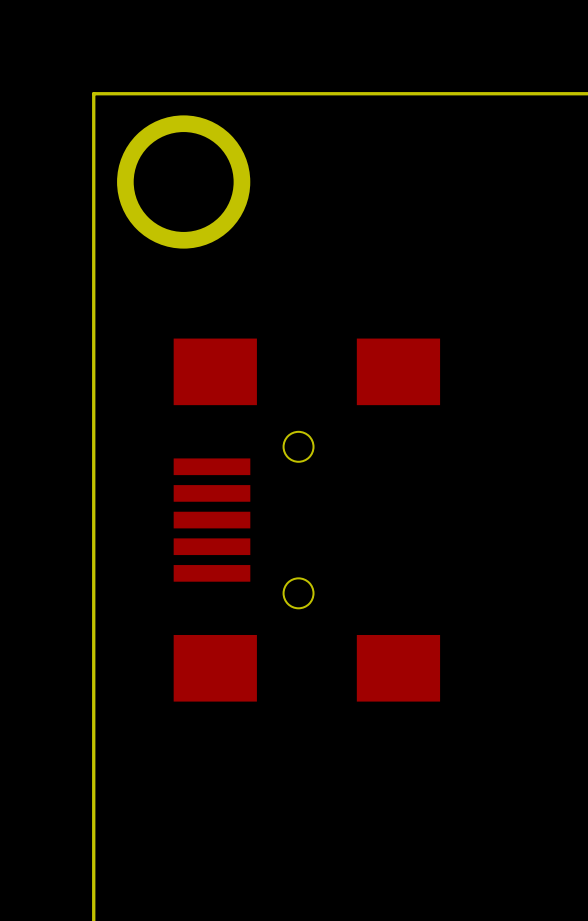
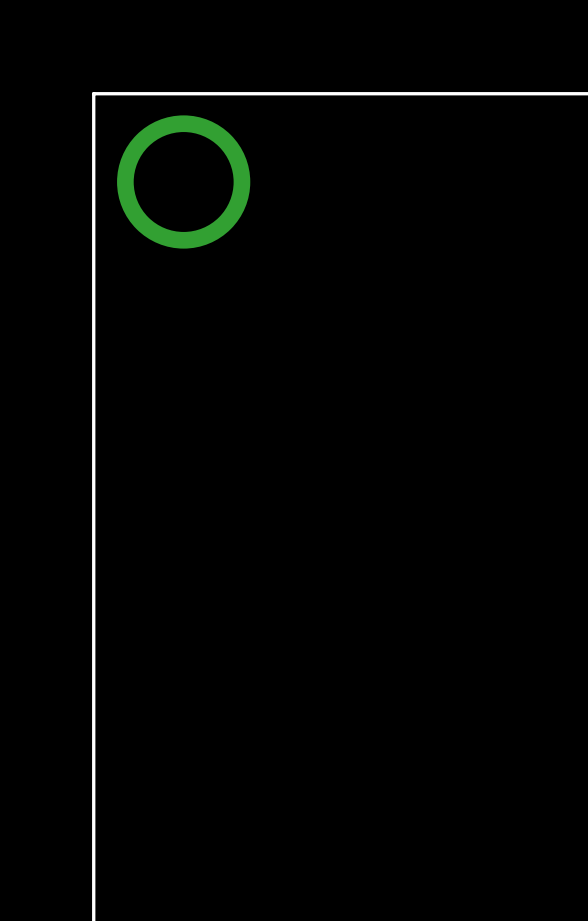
part: (306, 520) -> none

